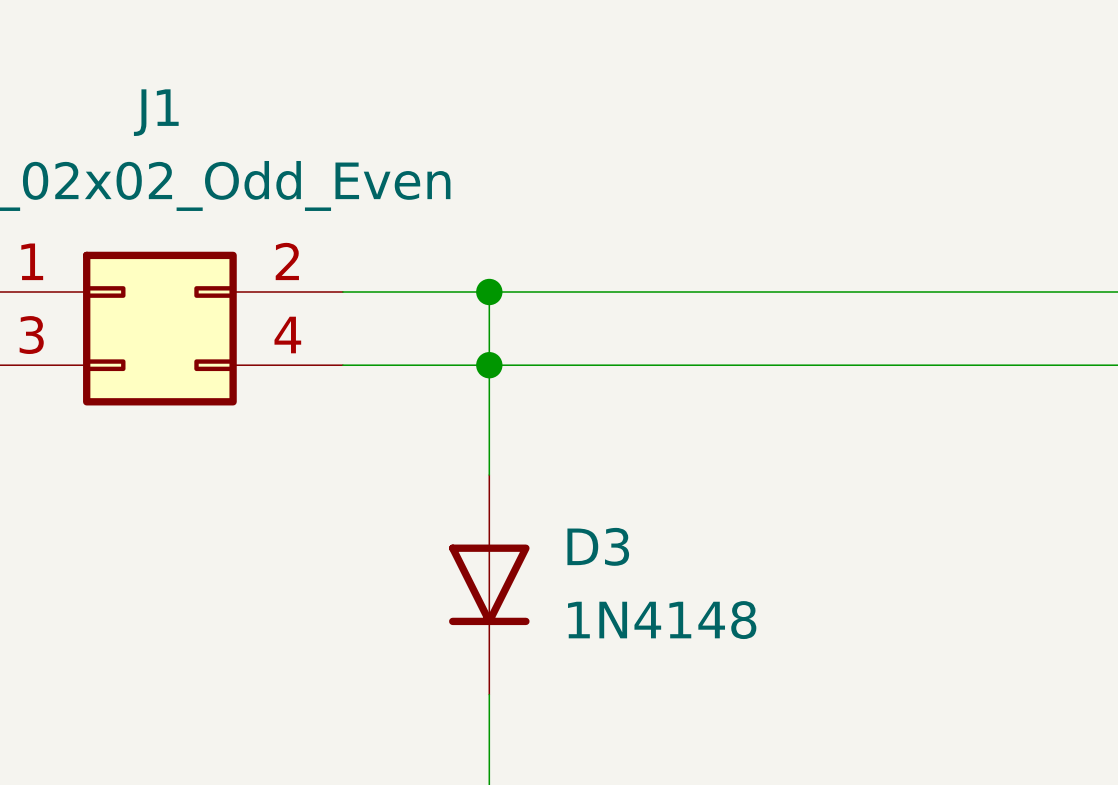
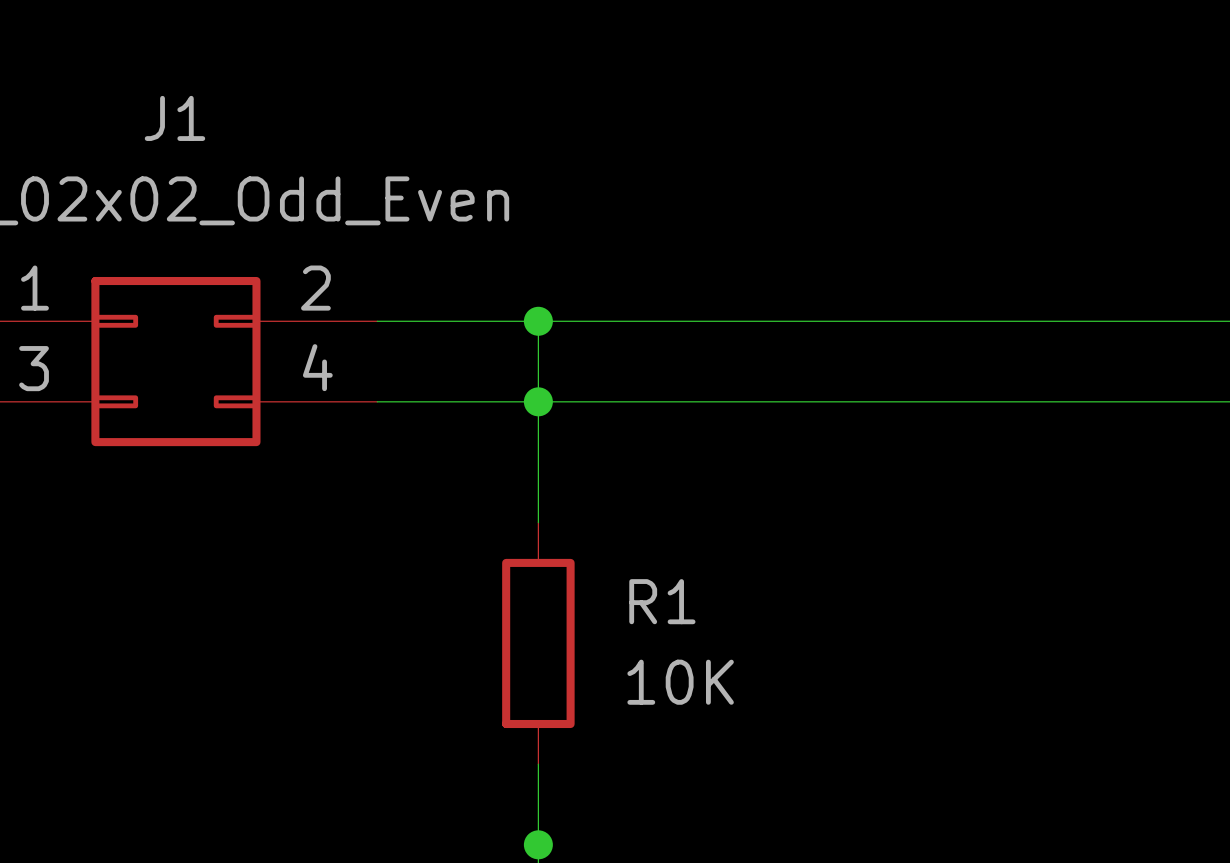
D3: 1N4148 (489, 584) -> none
R1: none -> 10K (538, 643)
junction: none -> (538, 844)

